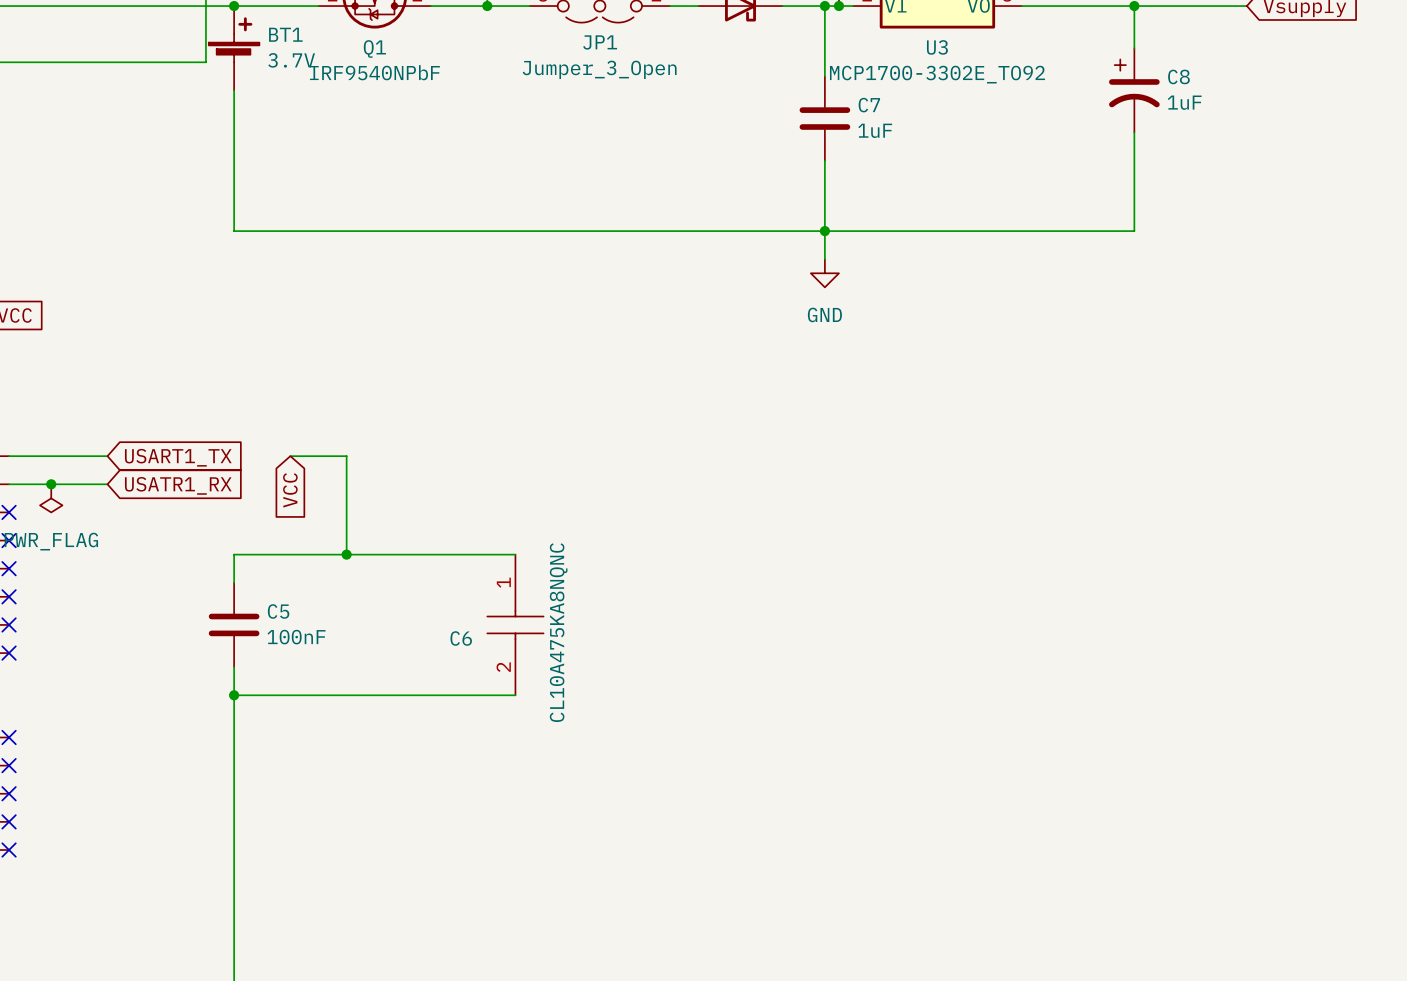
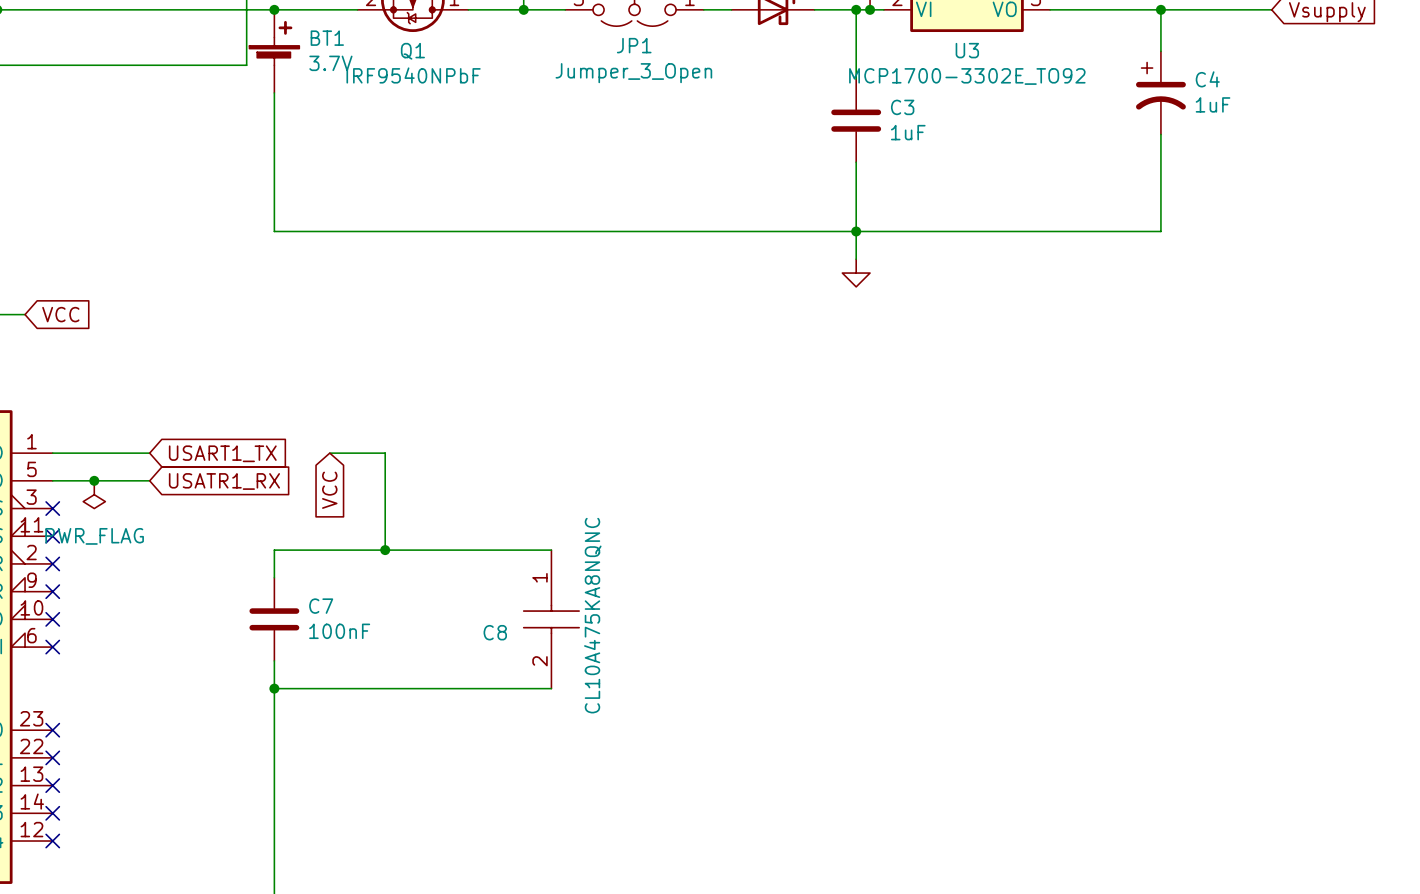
C8 name: C8 (1178, 76) -> C4 (1207, 79)
C7 name: C7 (869, 105) -> C3 (902, 107)
power symbol text: GND (824, 314) -> none
C5 name: C5 (278, 611) -> C7 (321, 606)
C6 name: C6 (461, 638) -> C8 (495, 632)

